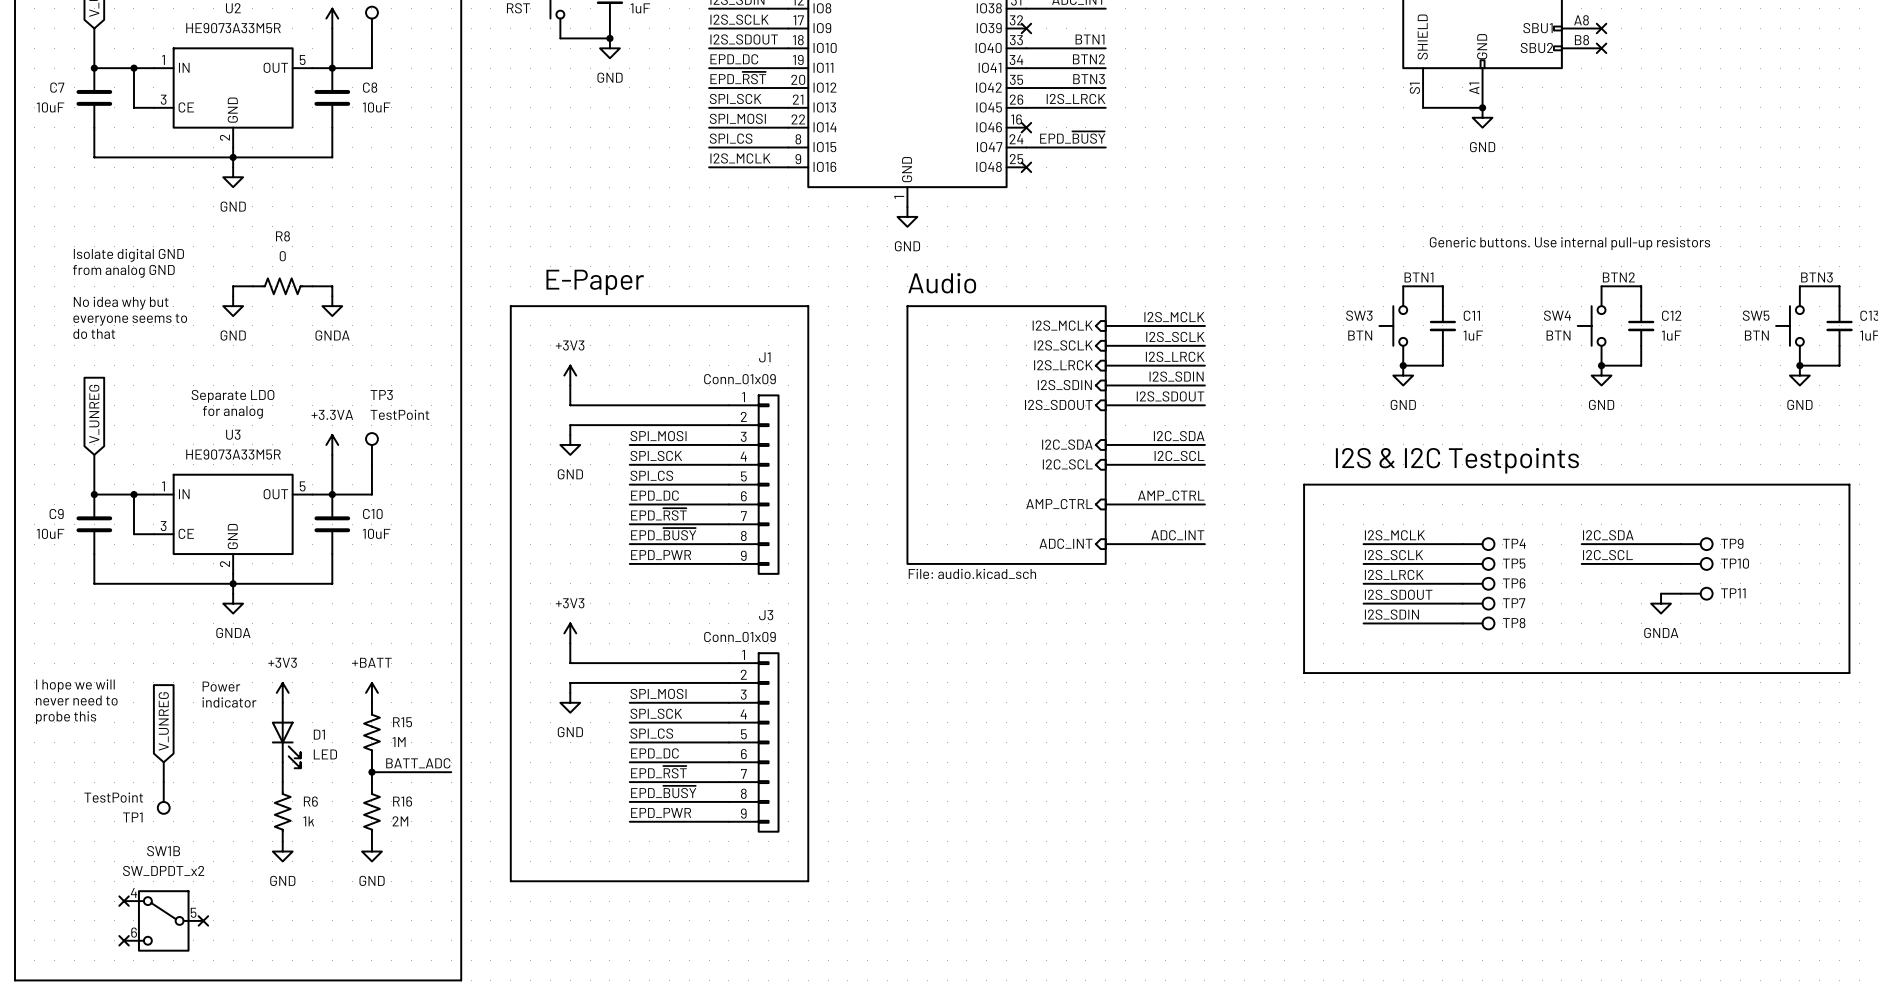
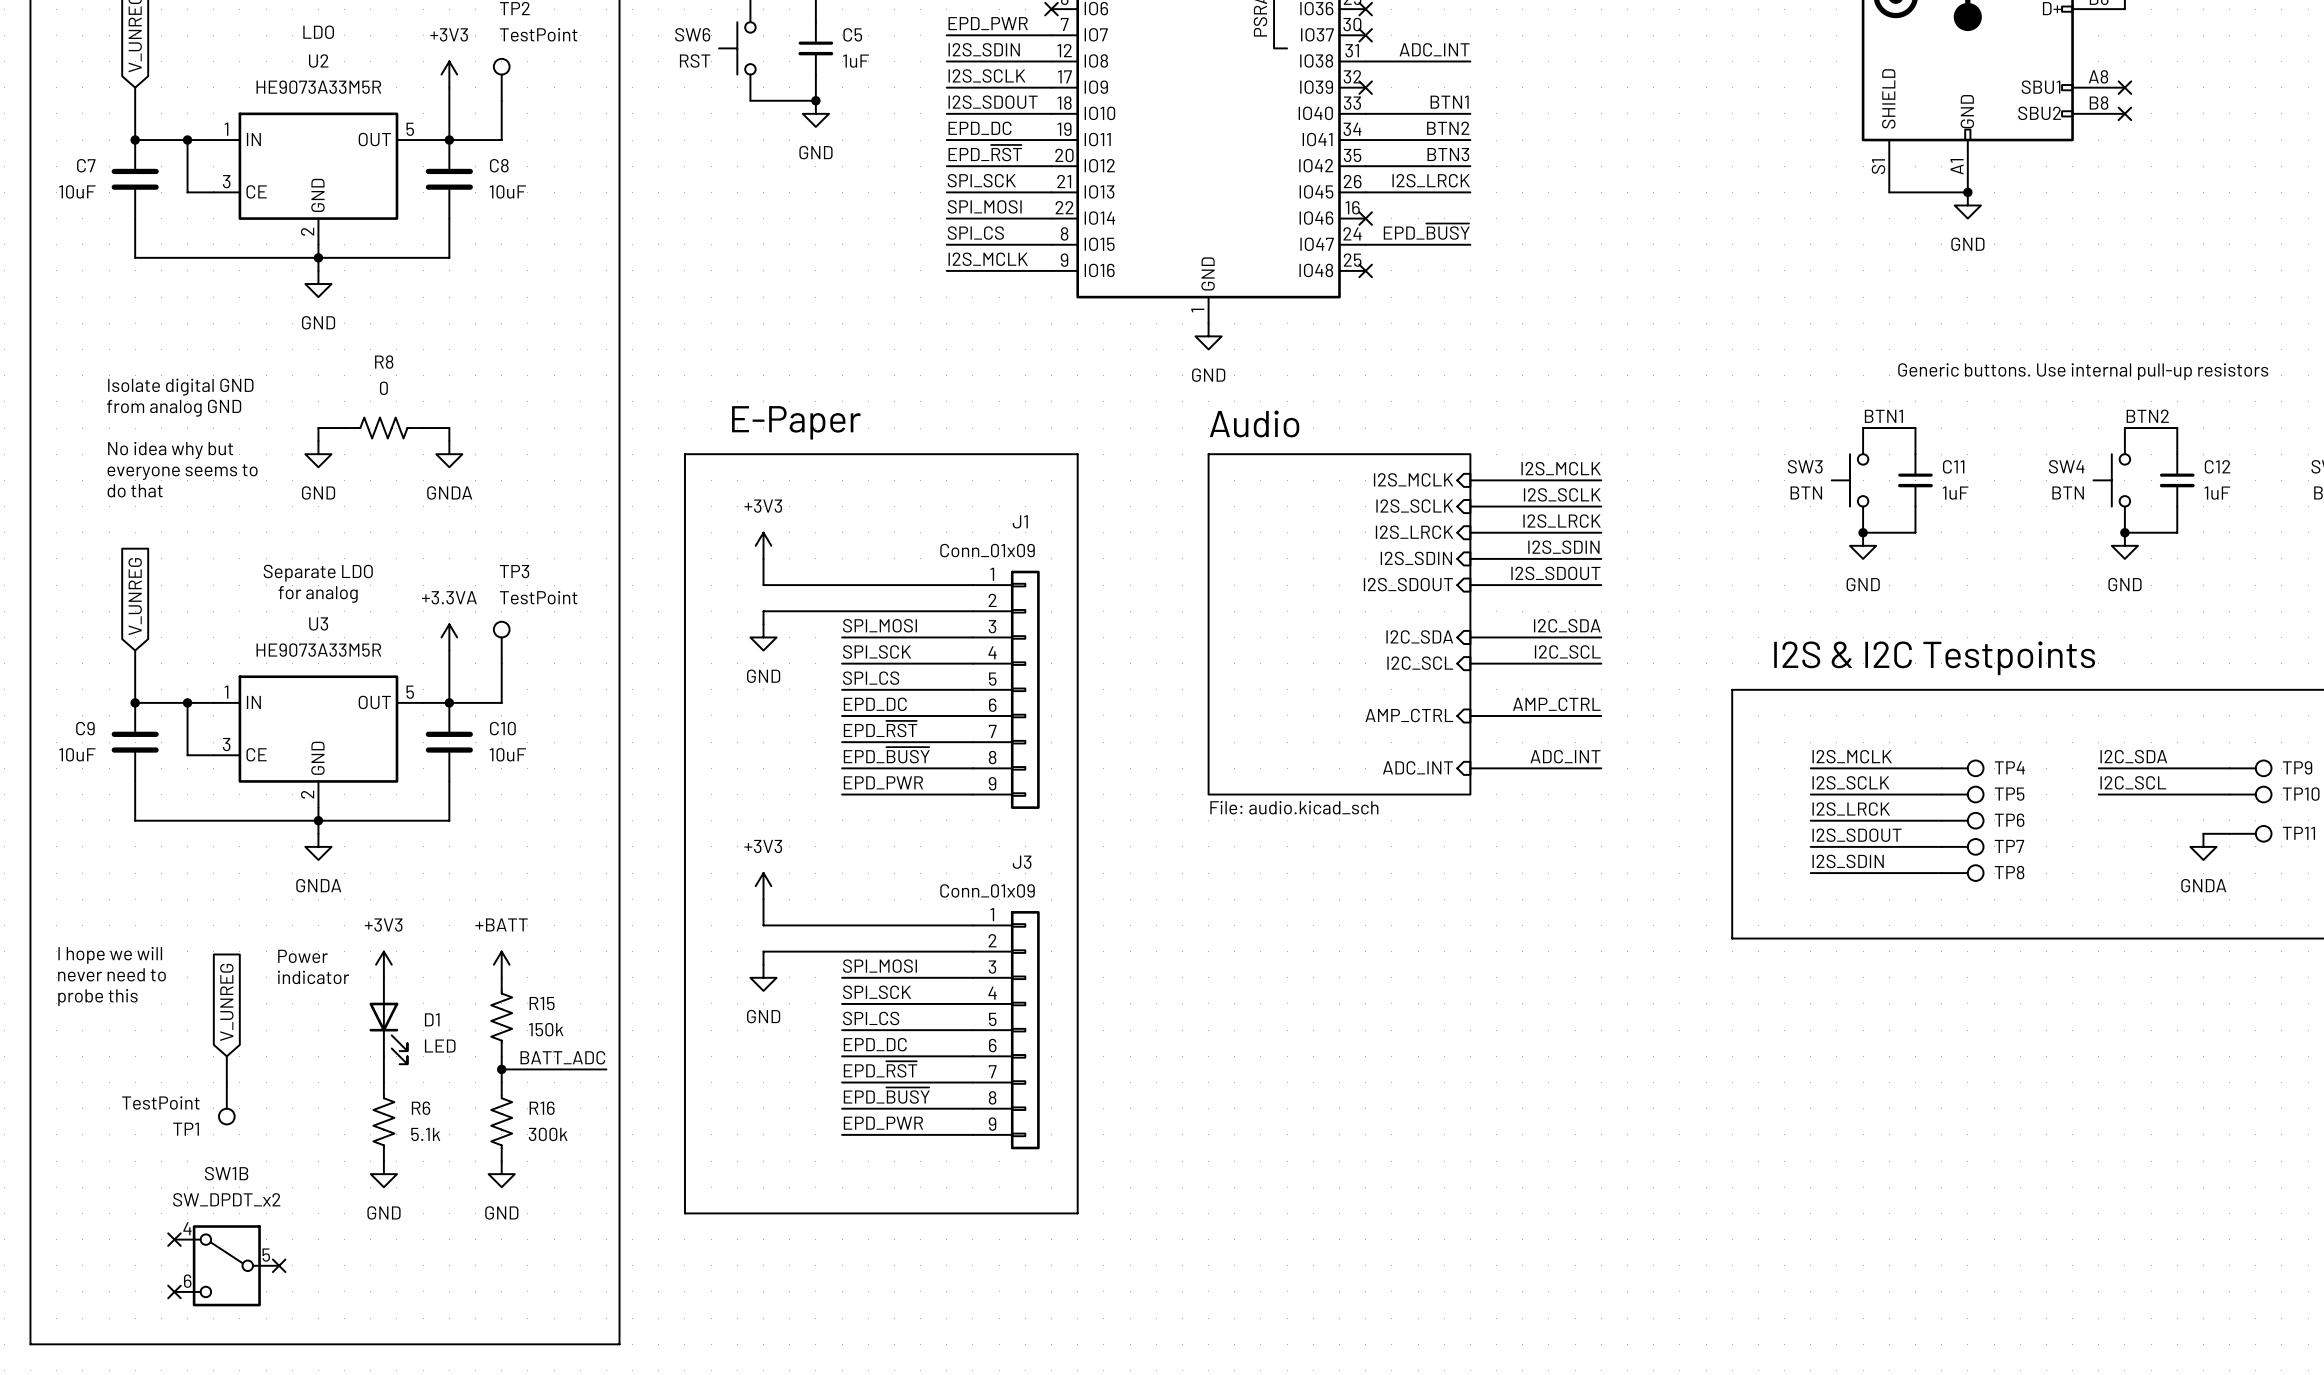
R15 value: 1M (399, 742) -> 150k (546, 1029)
R6 value: 1k (308, 821) -> 5.1k (425, 1134)
R16 value: 2M (400, 821) -> 300k (548, 1134)

